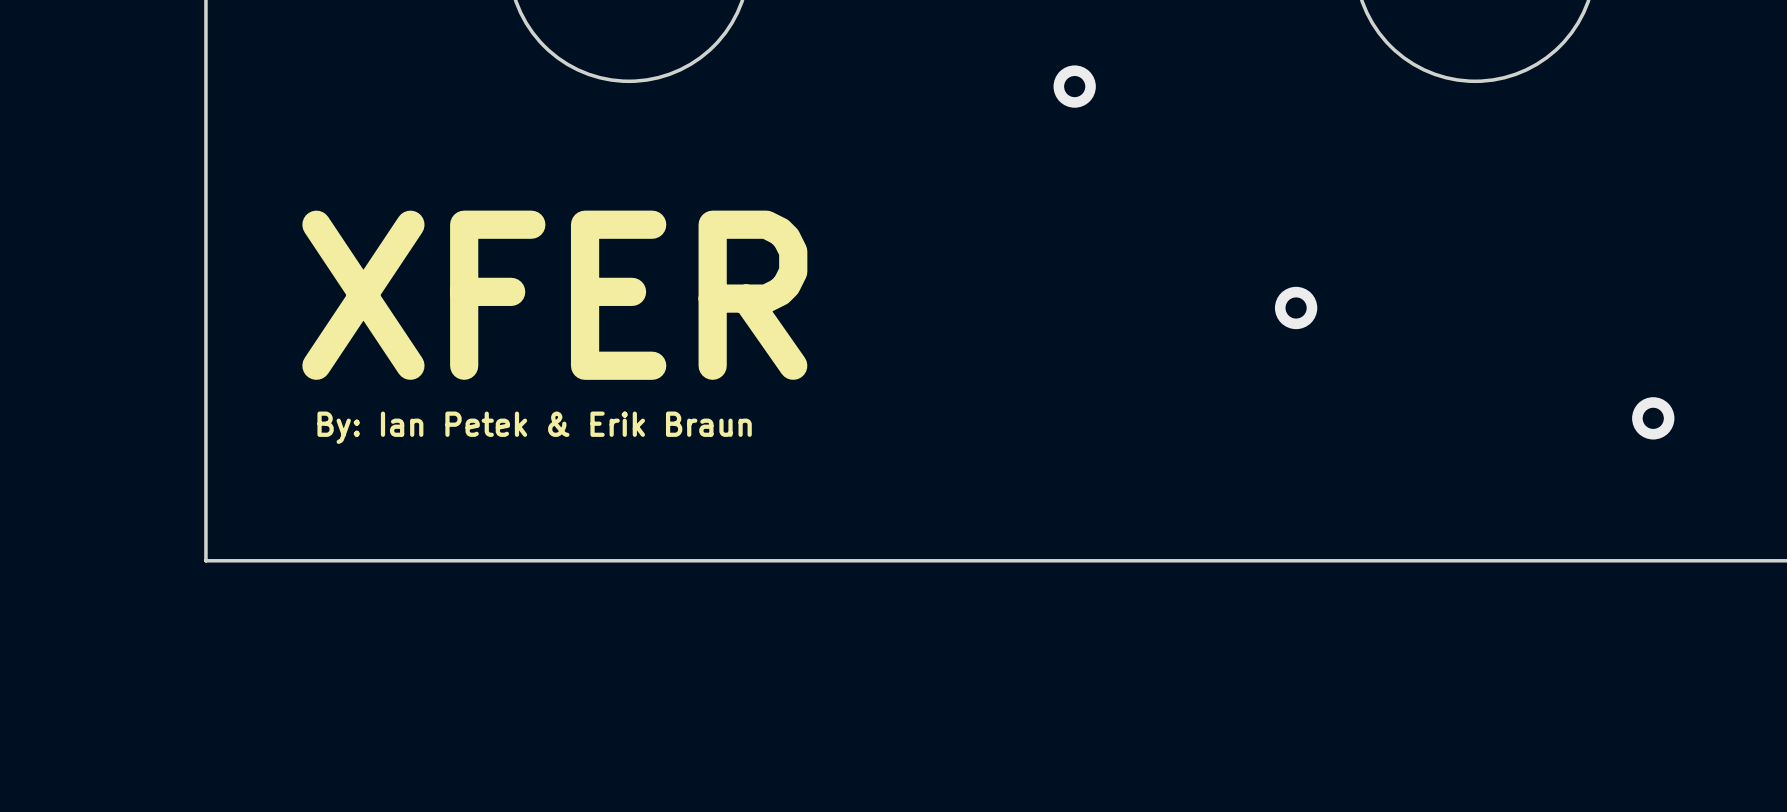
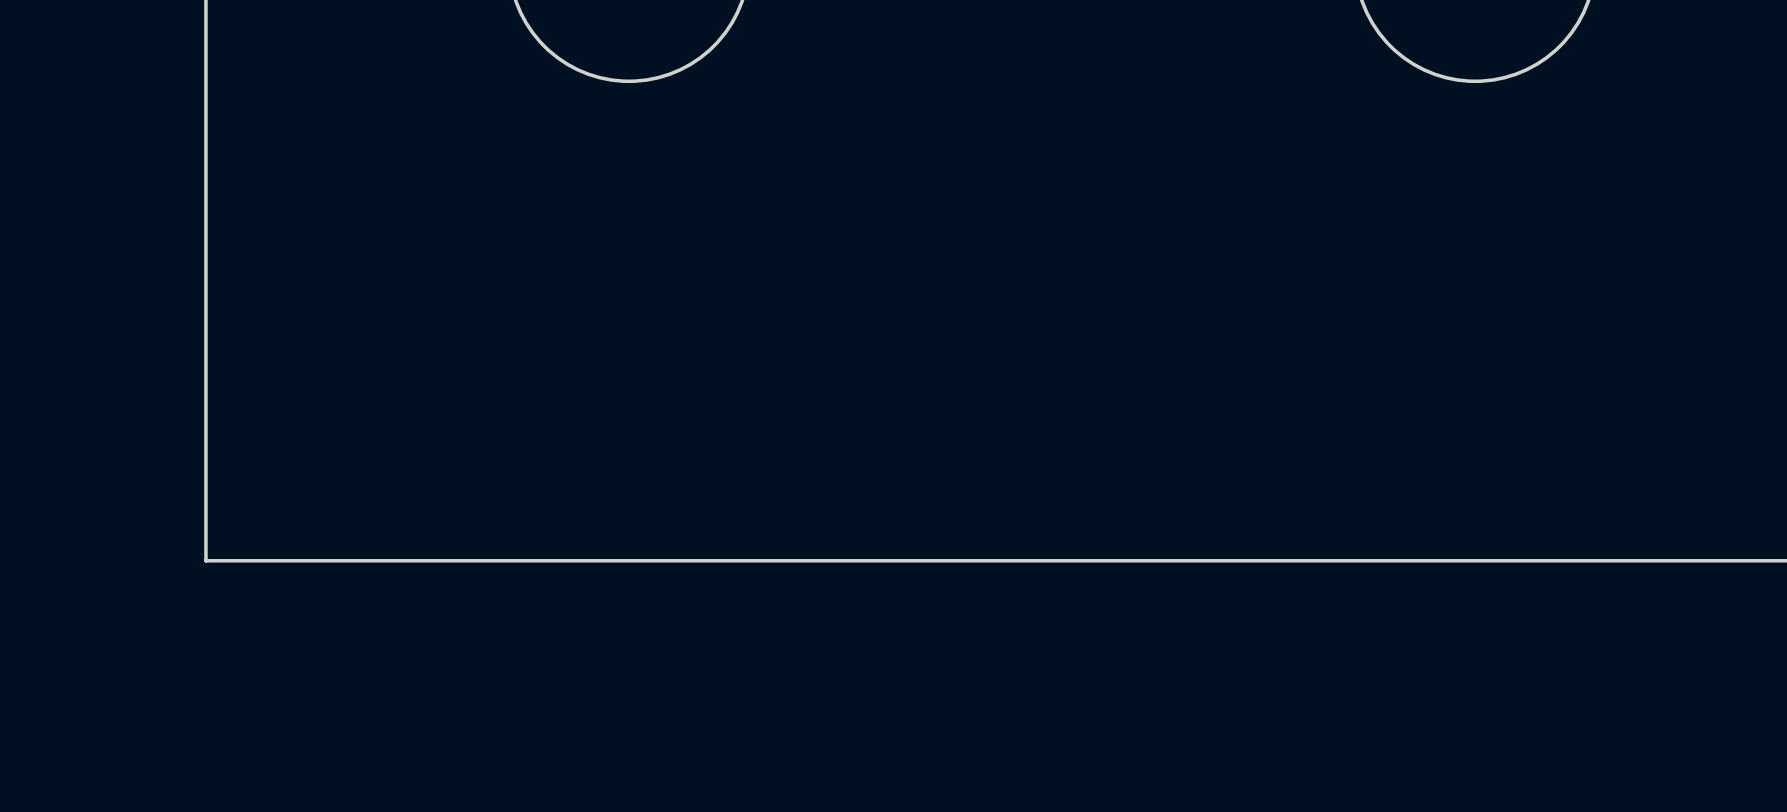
via: (1074, 86) -> none
text: XFER (554, 295) -> none
via: (1296, 307) -> none
via: (1653, 418) -> none
text: By: Ian Petek & Erik Braun (534, 427) -> none

